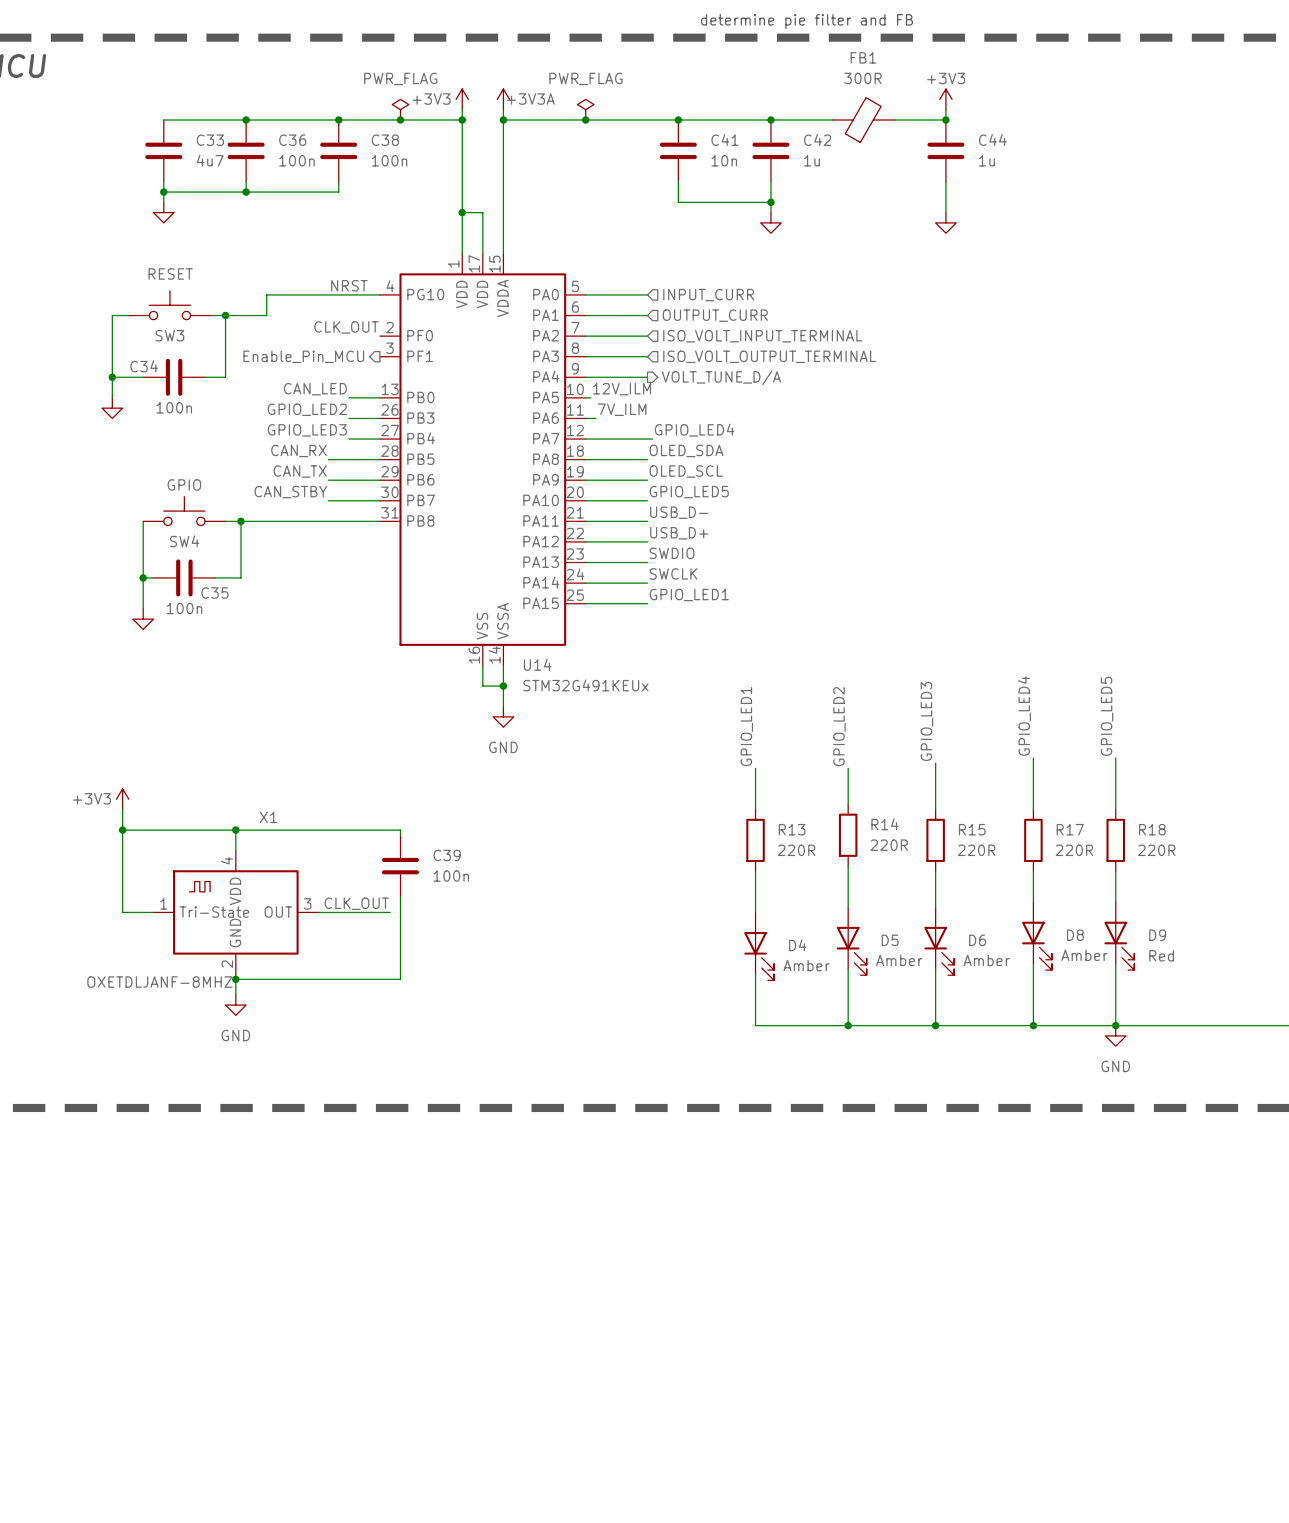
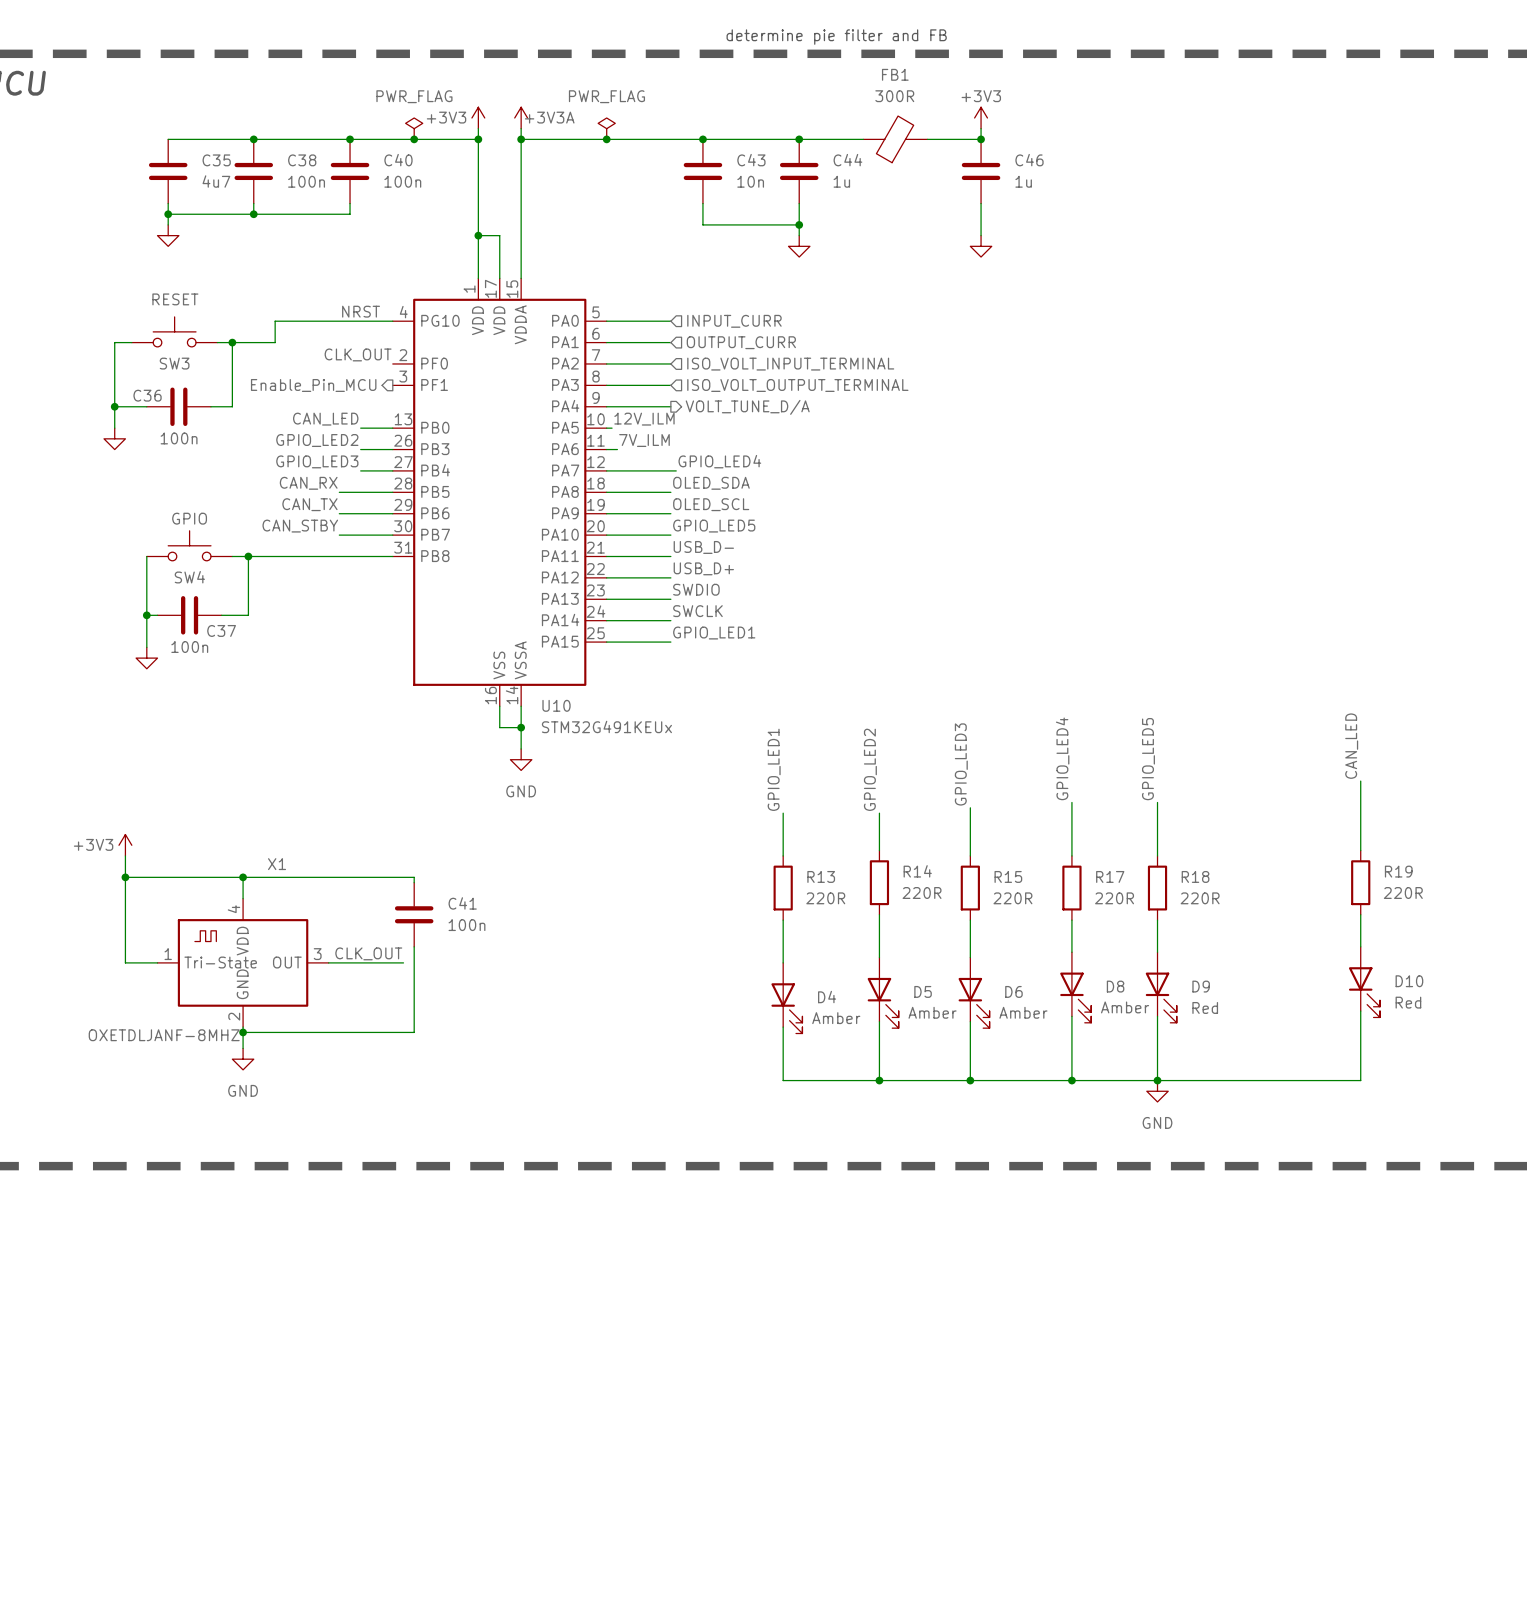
C41 name: C41 (724, 139) -> C43 (751, 160)
C42 name: C42 (817, 139) -> C44 (847, 160)
C44 name: C44 (992, 139) -> C46 (1029, 160)
C33 name: C33 (210, 140) -> C35 (216, 160)
C36 name: C36 (292, 140) -> C38 (302, 160)
C38 name: C38 (385, 140) -> C40 (398, 160)
C34 name: C34 (144, 366) -> C36 (147, 395)
C35 name: C35 (214, 593) -> C37 (221, 630)
U14 name: U14 (537, 664) -> U10 (556, 705)
C39 name: C39 (447, 855) -> C41 (462, 903)

